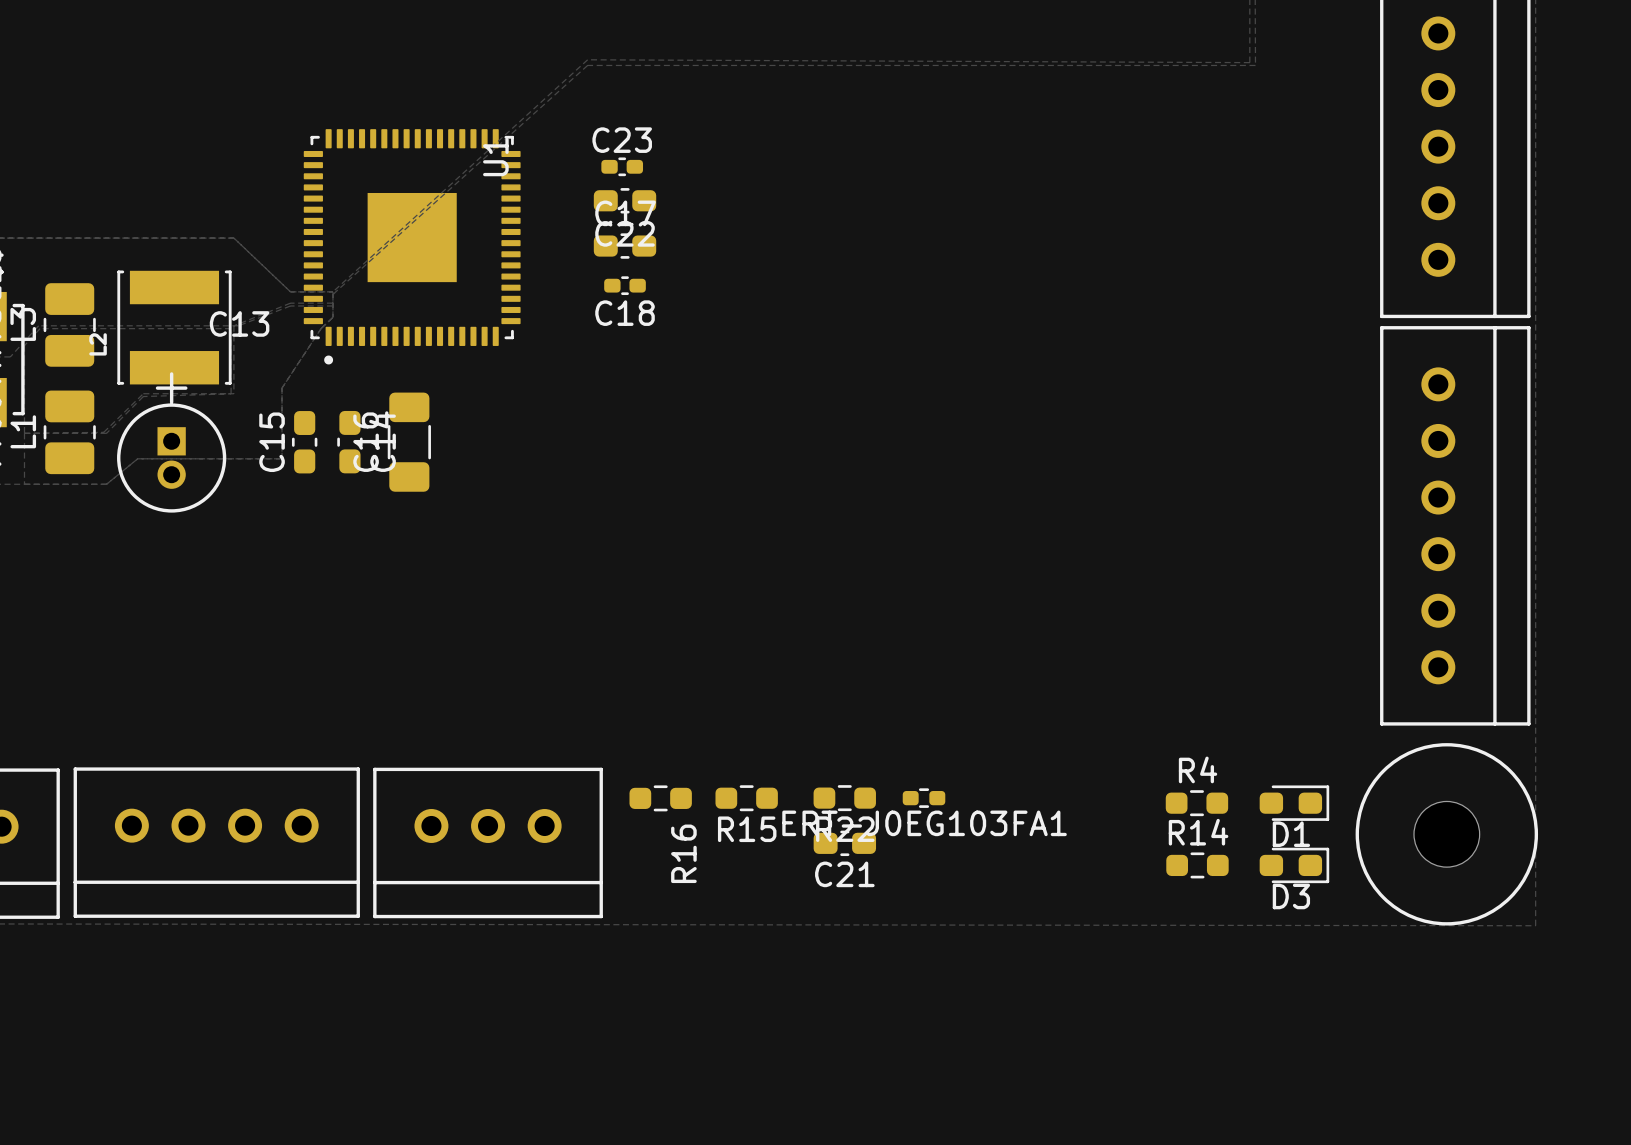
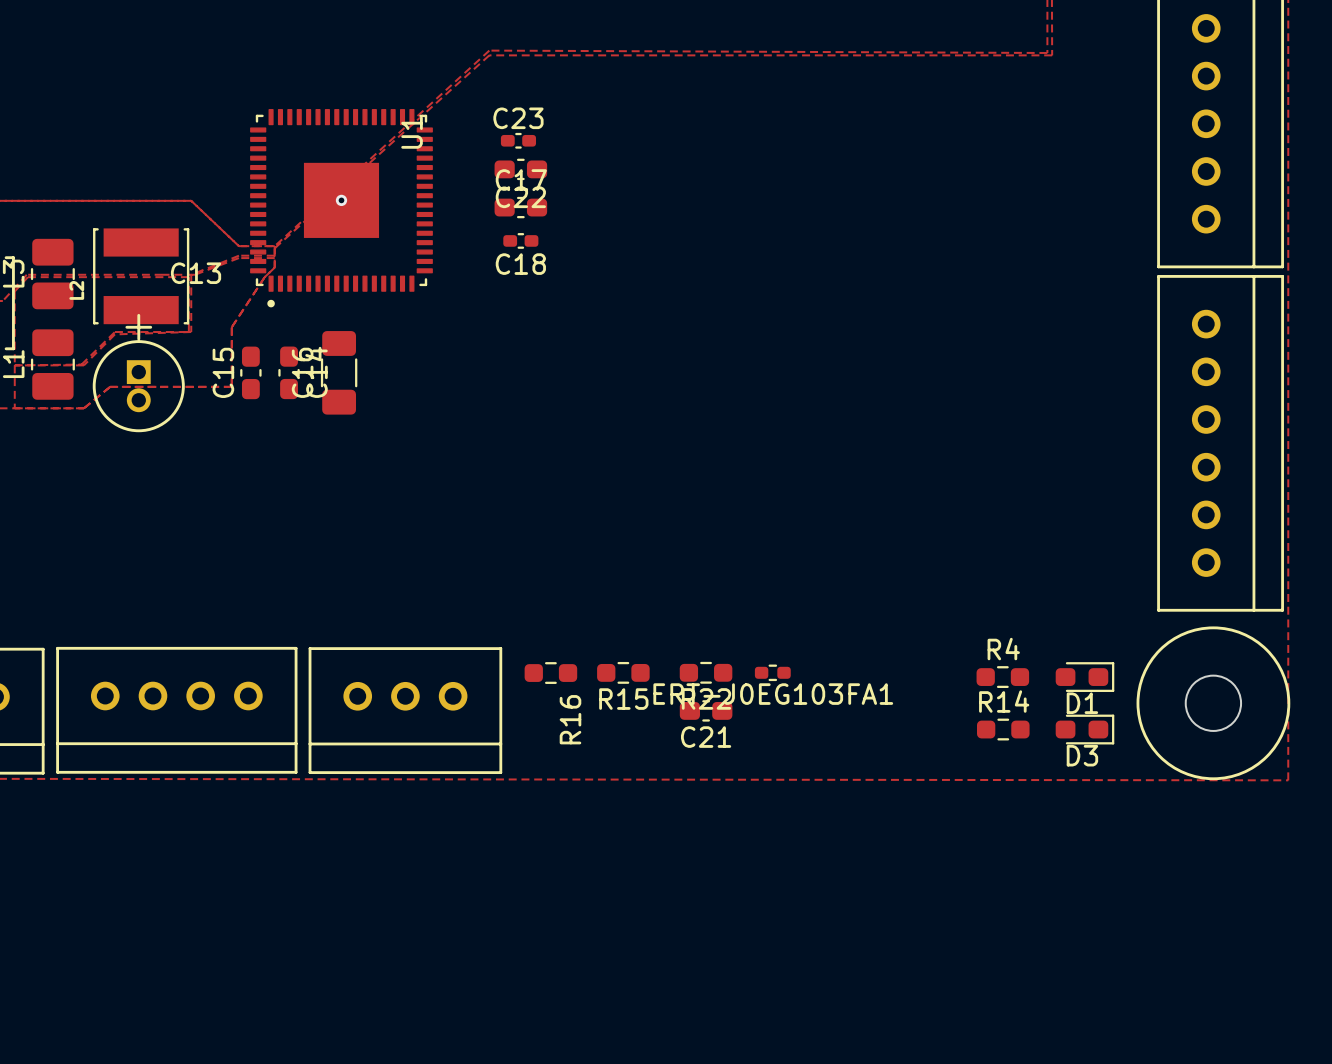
via: none -> (341, 200)

